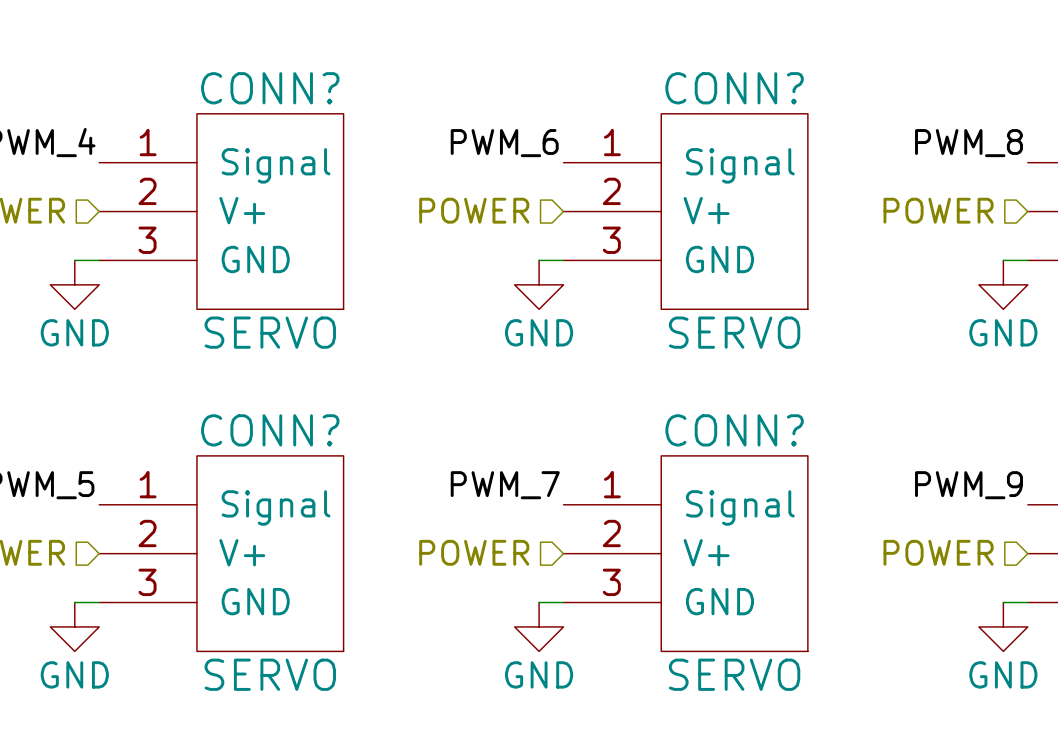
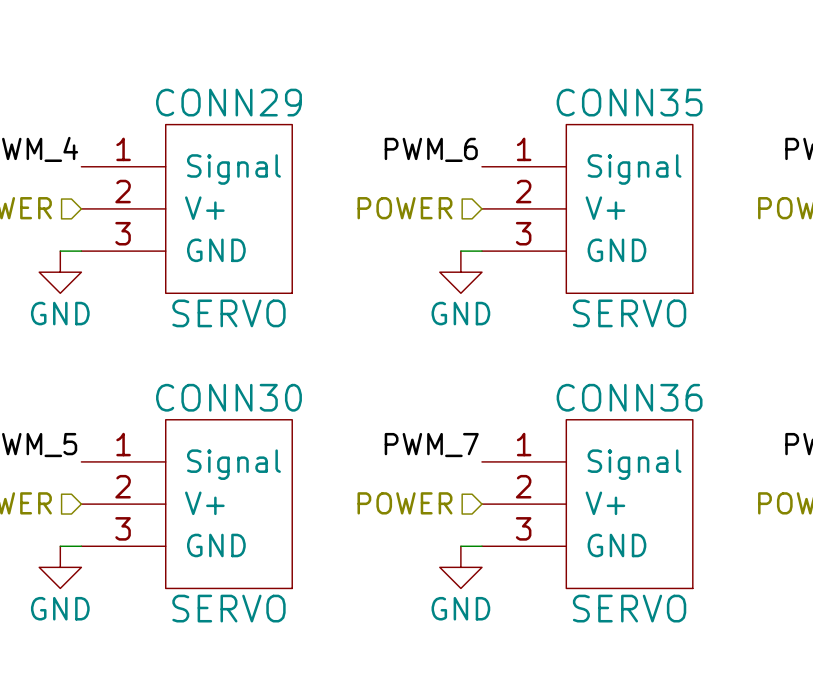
CONN? name: CONN? (270, 88) -> CONN29 (228, 102)
CONN? name: CONN? (734, 88) -> CONN35 (629, 102)
CONN? name: CONN? (270, 430) -> CONN30 (228, 397)
CONN? name: CONN? (734, 430) -> CONN36 (629, 397)

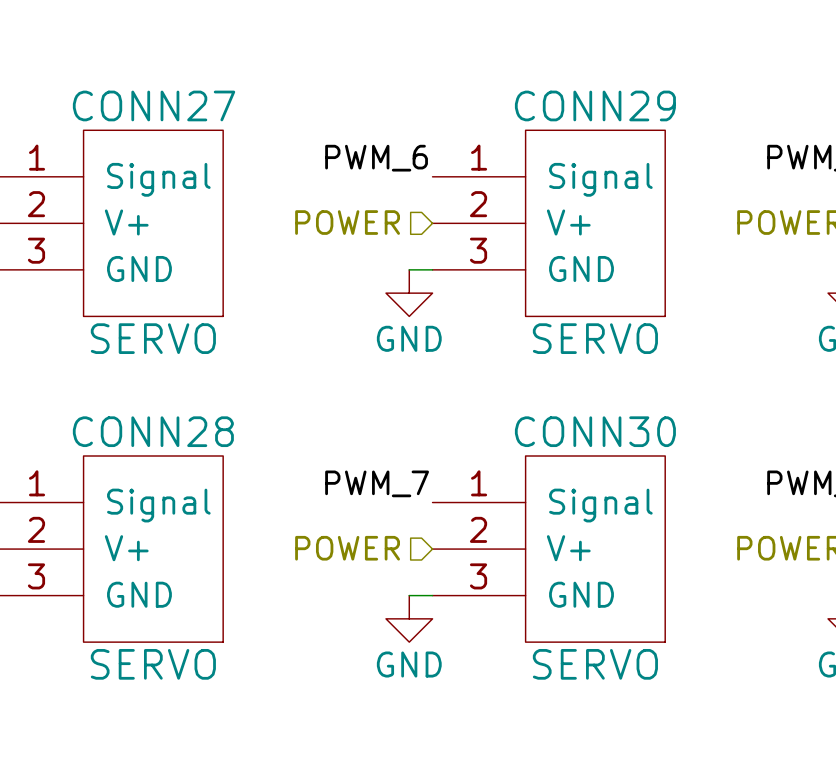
CONN29 name: CONN29 (228, 102) -> CONN27 (154, 105)
CONN35 name: CONN35 (629, 102) -> CONN29 (595, 105)
CONN30 name: CONN30 (228, 397) -> CONN28 (153, 431)
CONN36 name: CONN36 (629, 397) -> CONN30 (595, 431)

